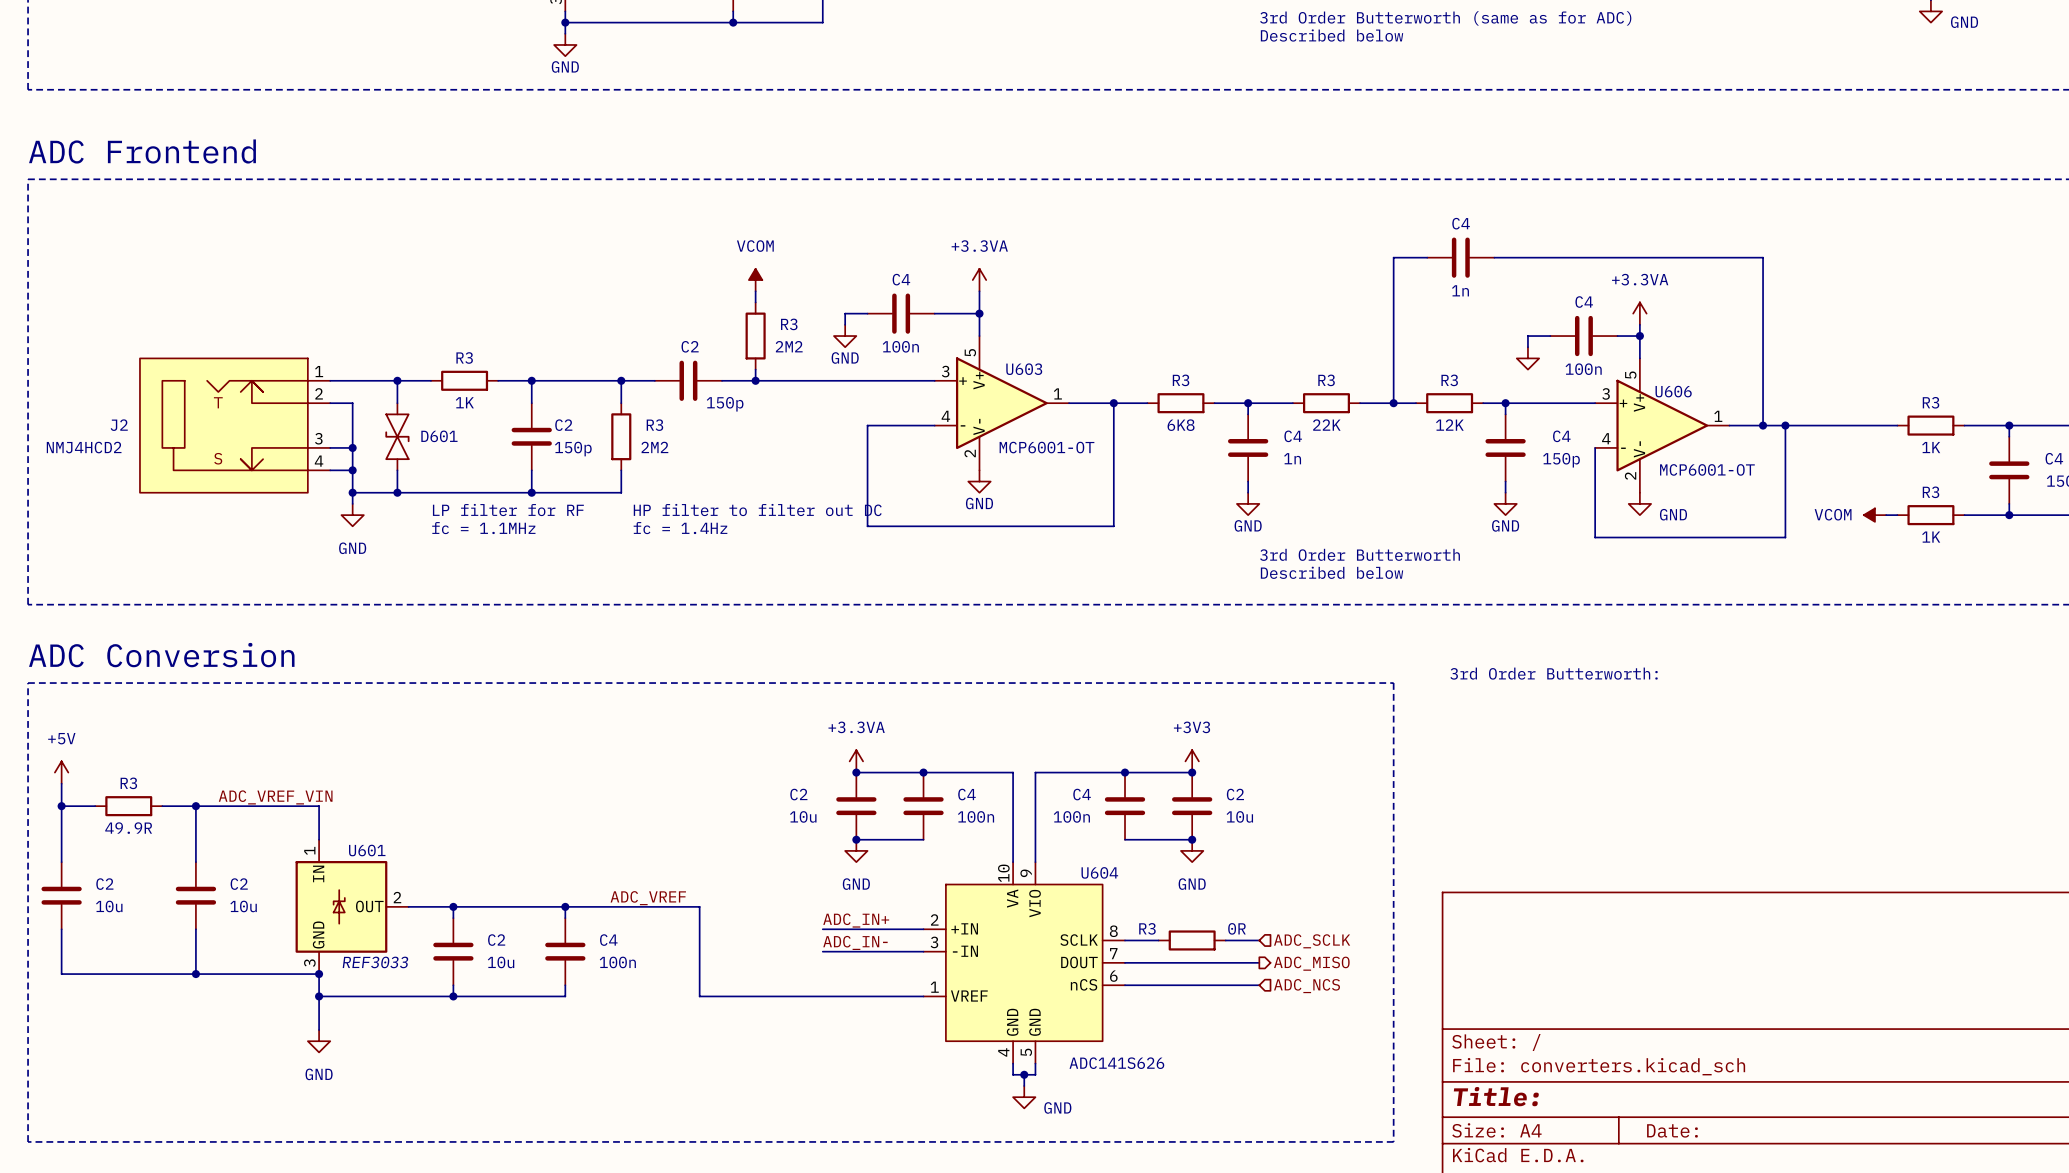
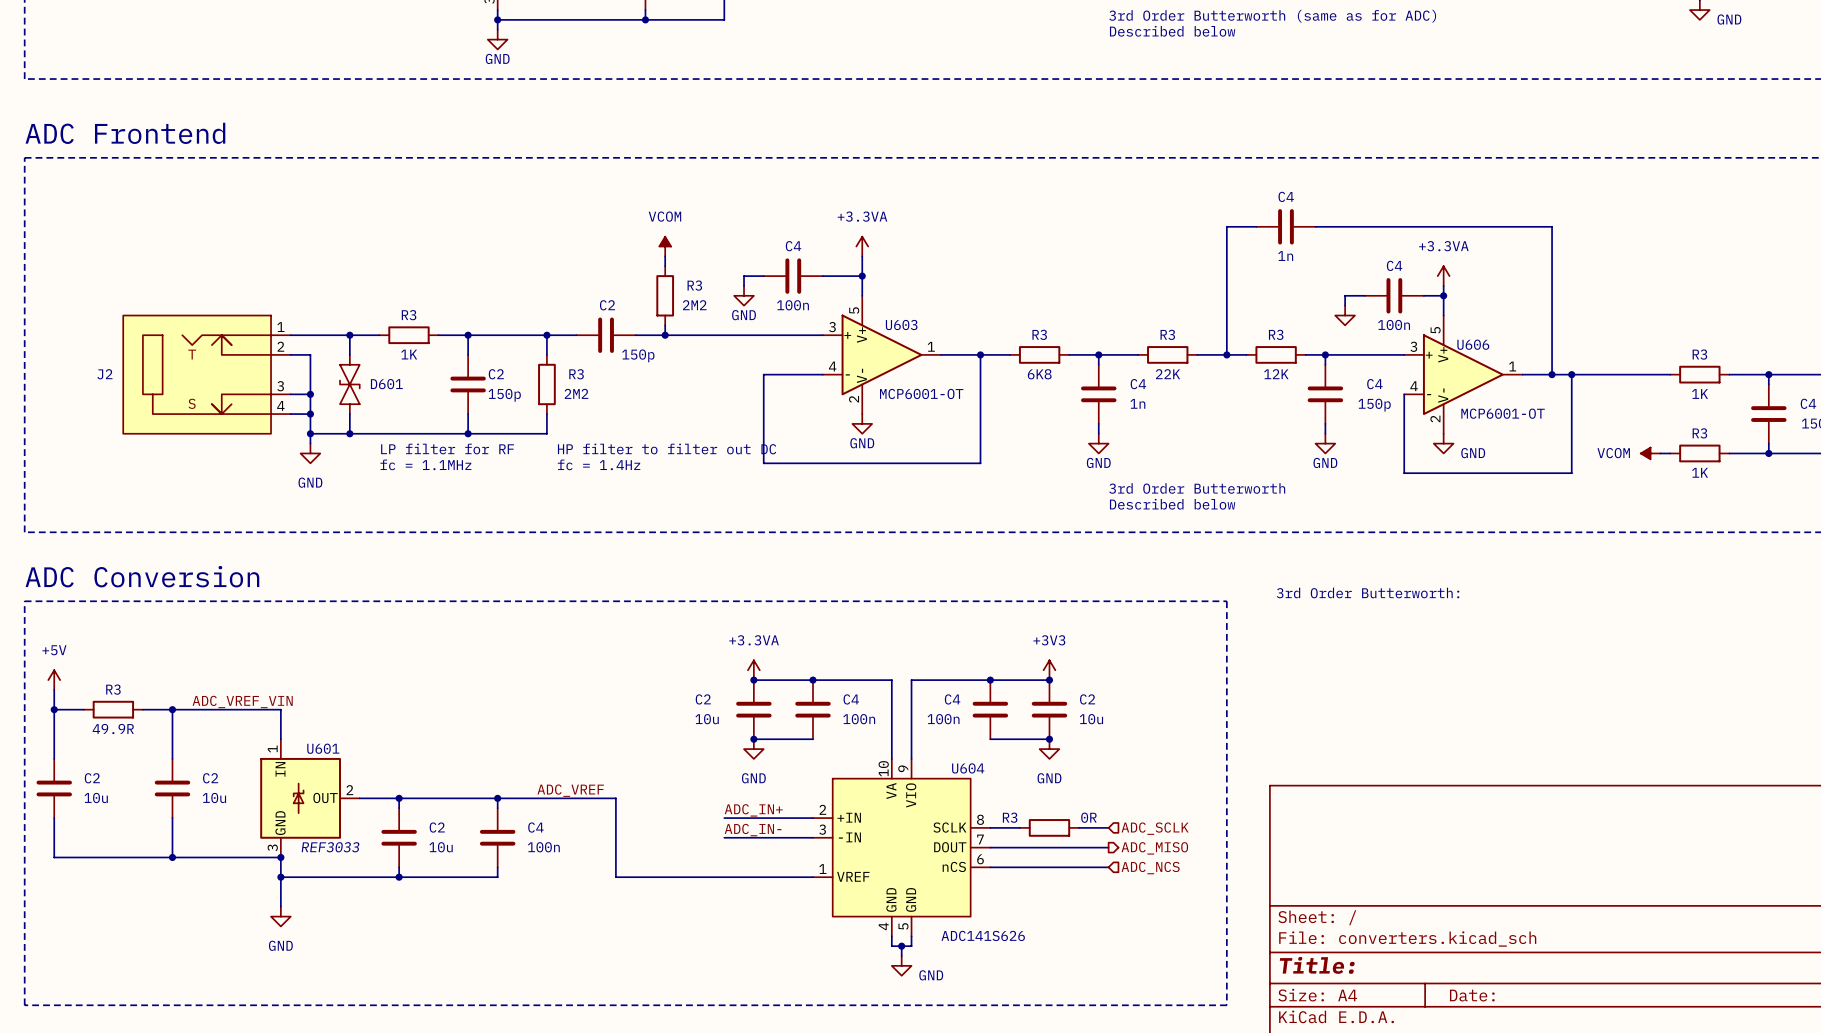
J2 value: NMJ4HCD2 (84, 447) -> none

